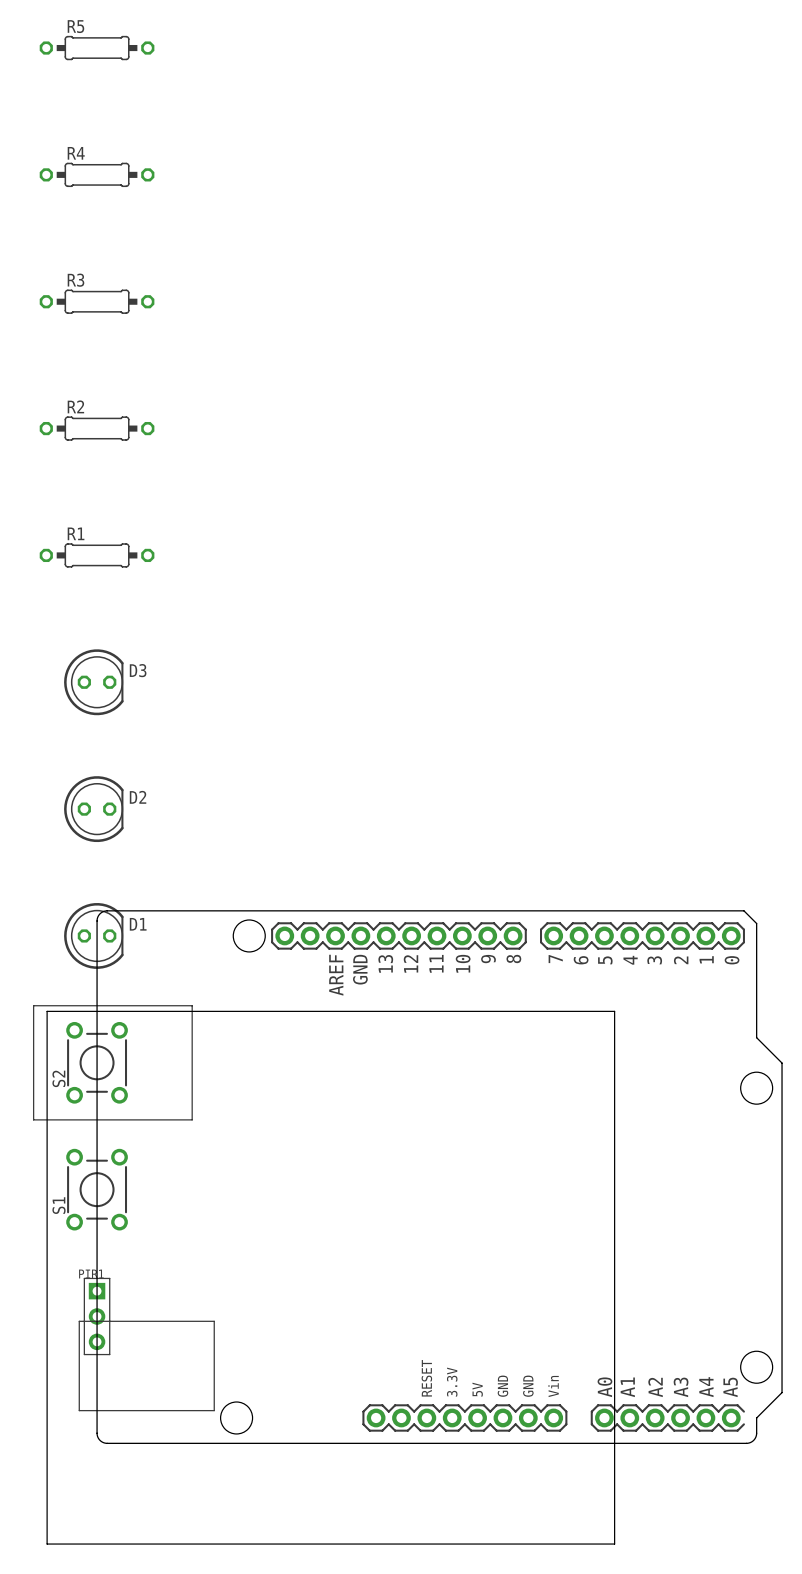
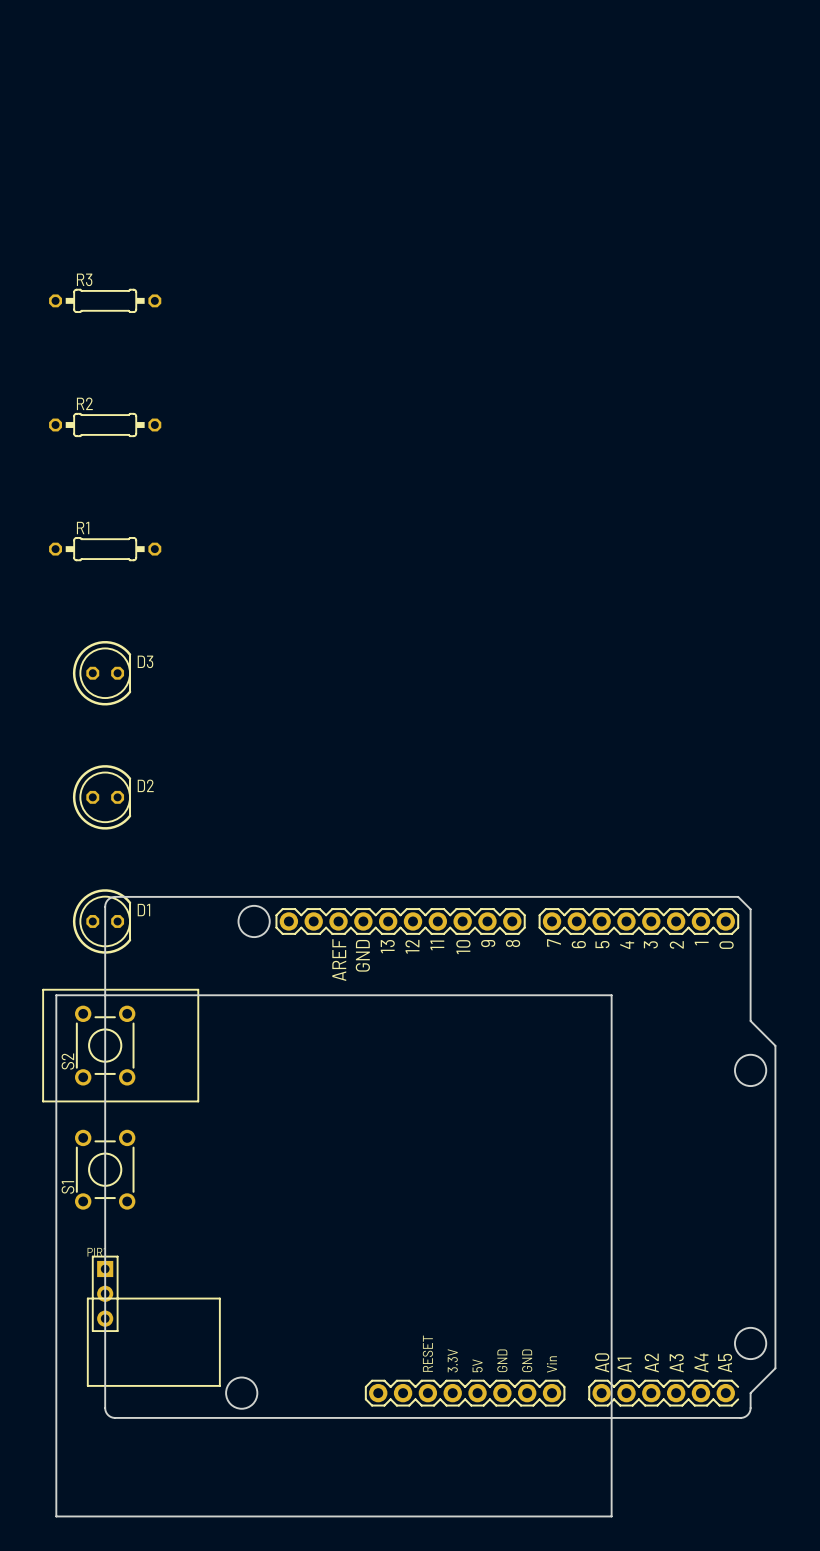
R5: (97, 48) -> none
R4: (97, 174) -> none

